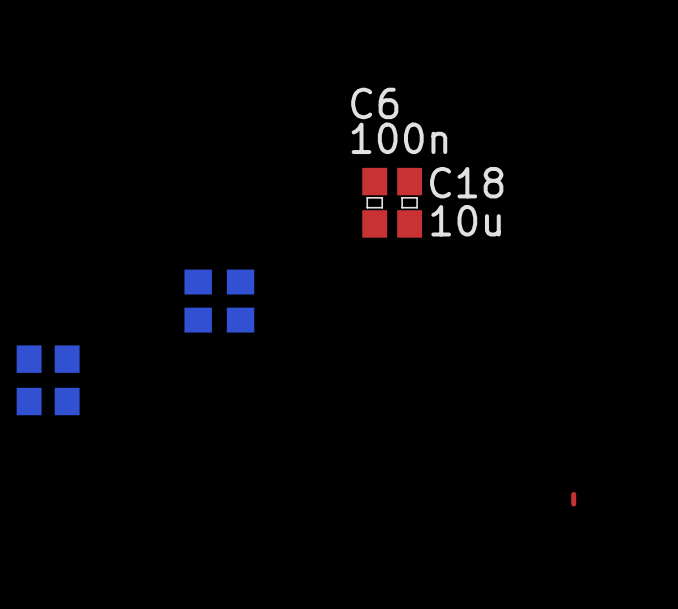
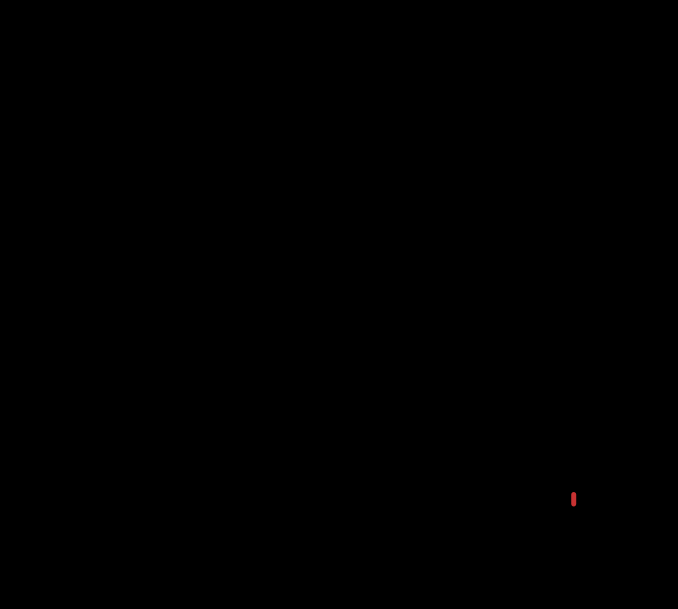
C6: 100n (374, 202) -> none
C18: 10u (409, 202) -> none
part: (219, 282) -> none
part: (219, 320) -> none
part: (29, 380) -> none
part: (67, 380) -> none

